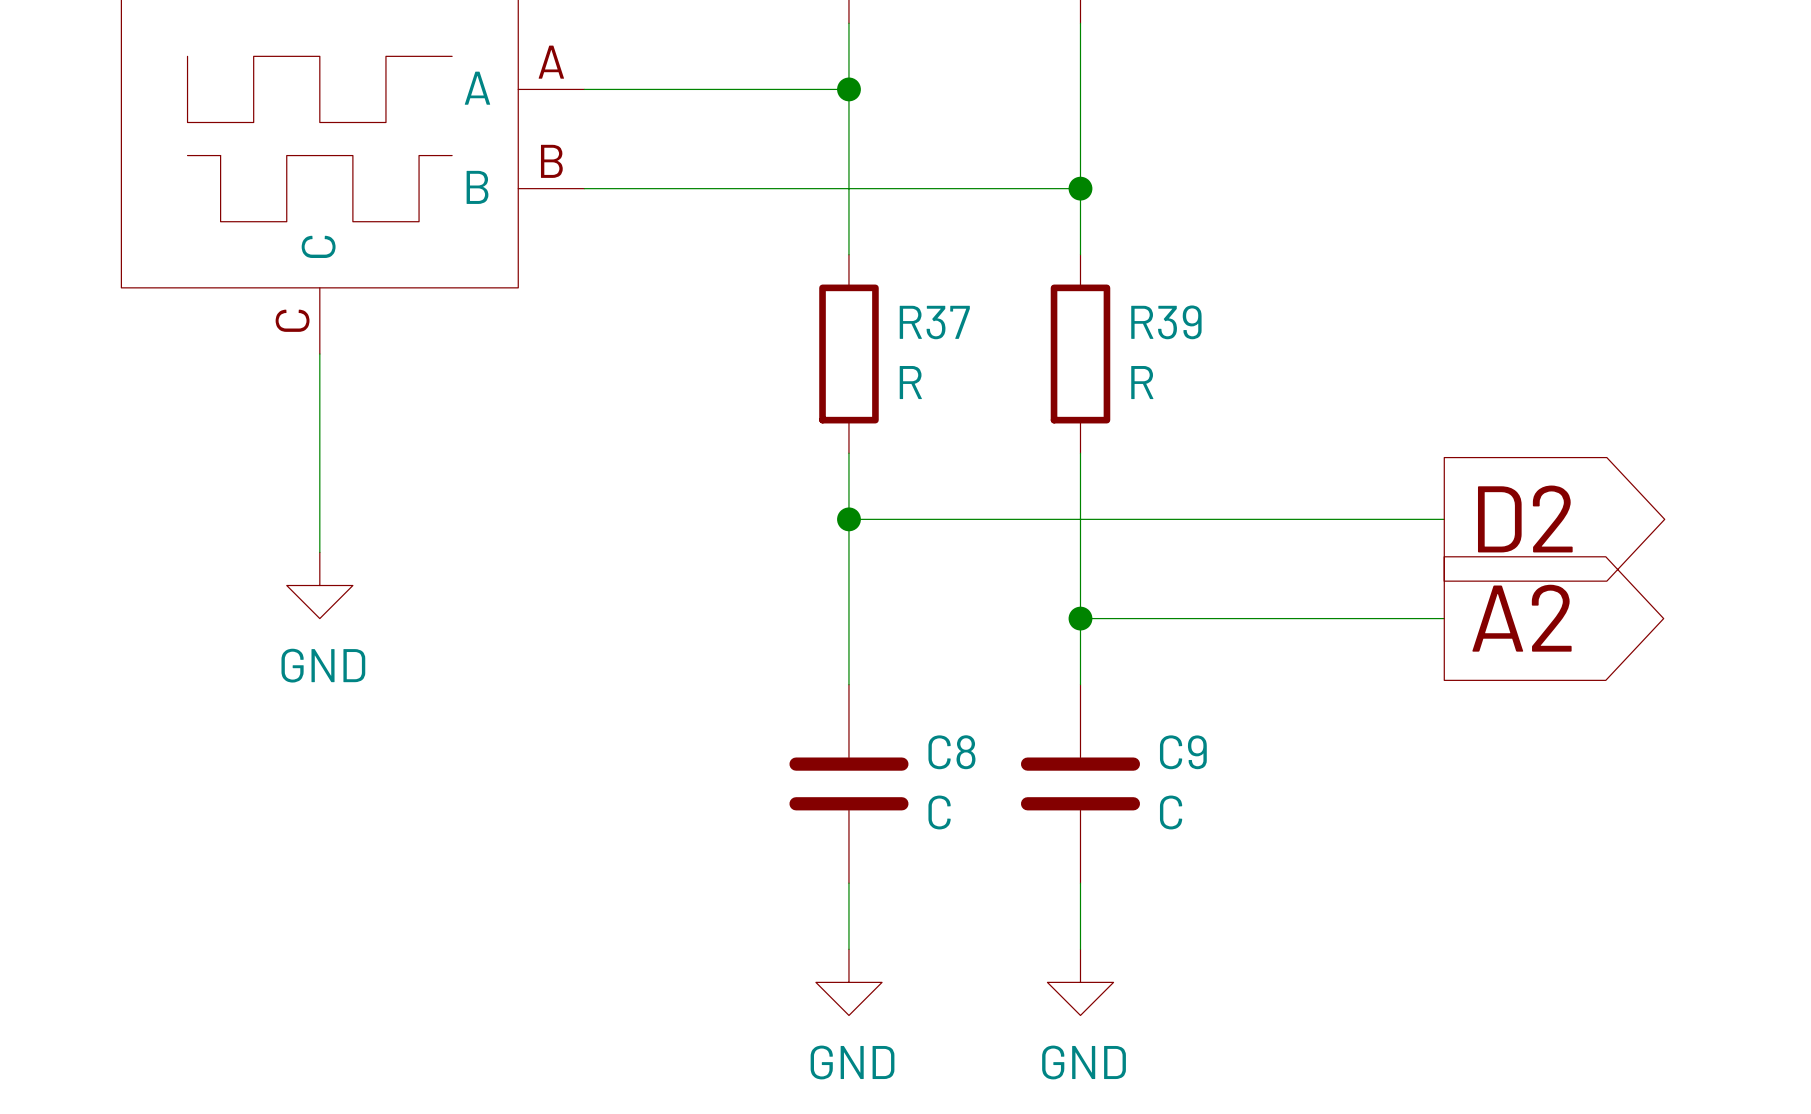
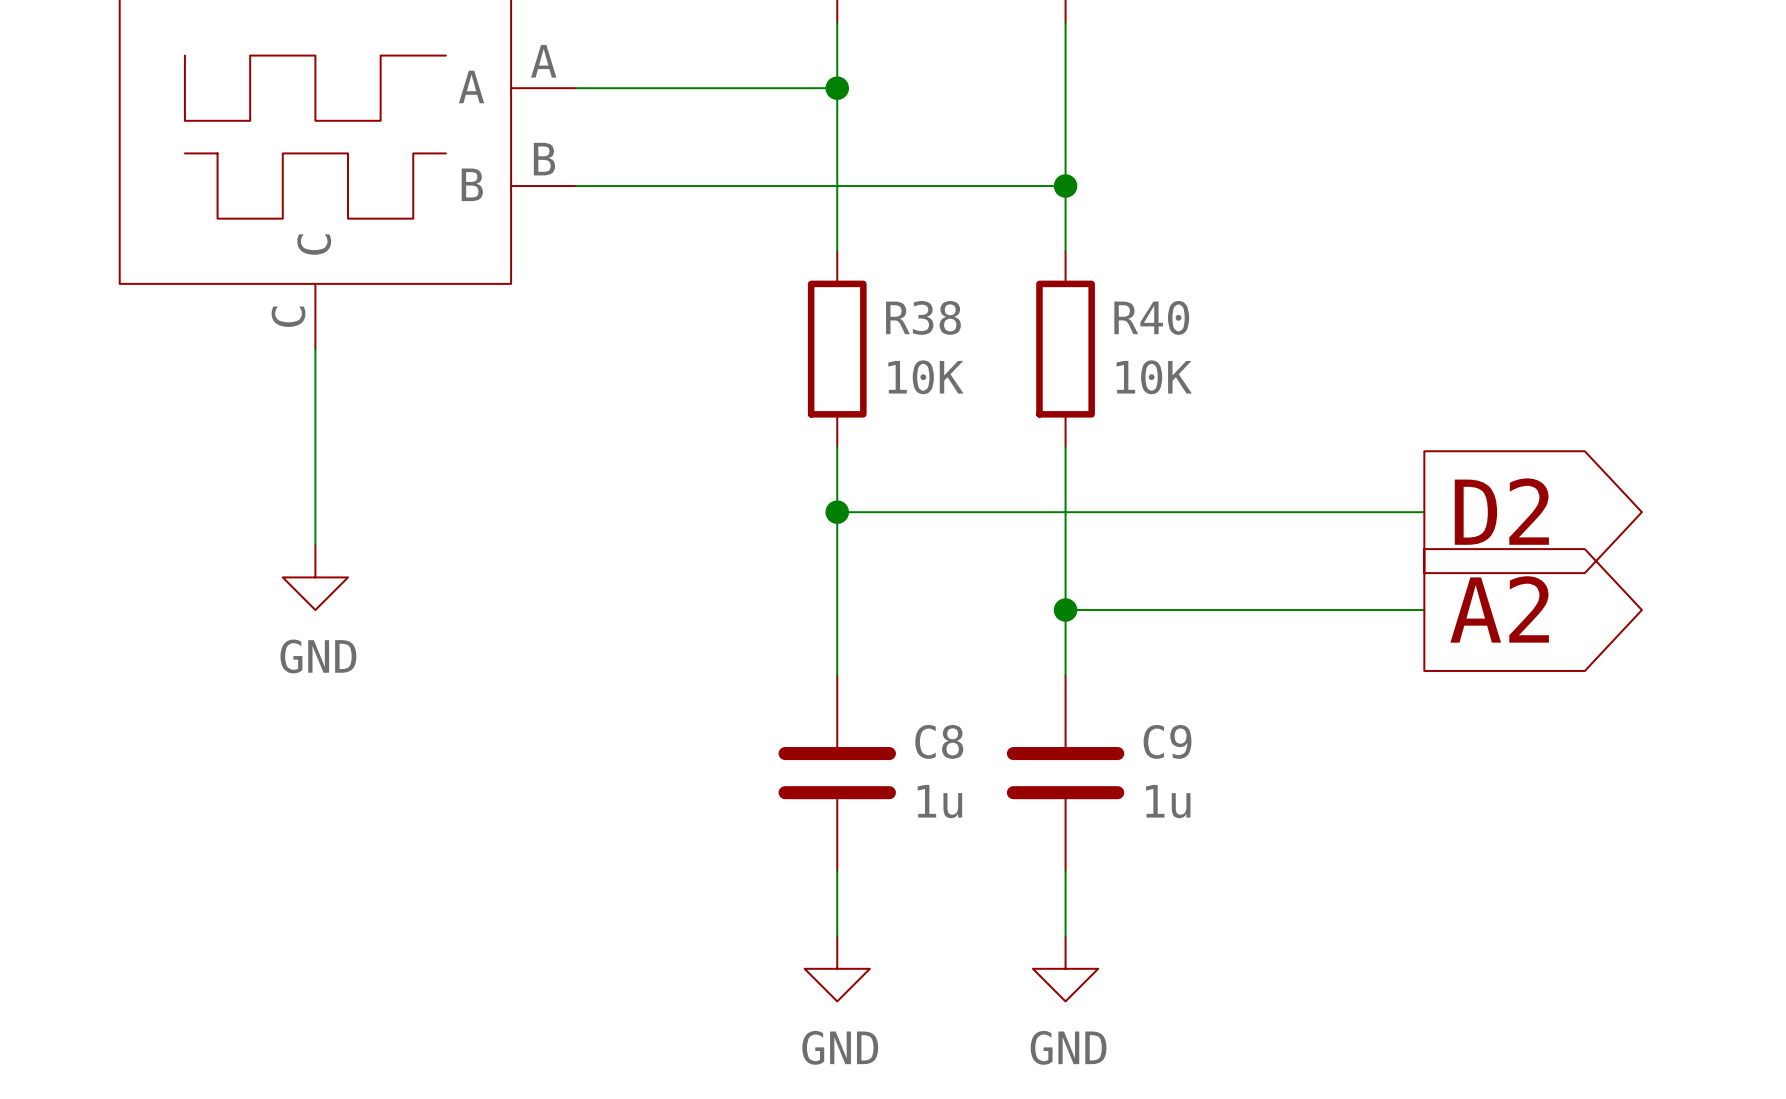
R37 name: R37 (934, 322) -> R38 (923, 317)
R39 name: R39 (1166, 322) -> R40 (1151, 317)
R37 value: R (910, 382) -> 10K (925, 377)
R39 value: R (1142, 382) -> 10K (1154, 377)
C8 value: C (939, 812) -> 1u (939, 801)
C9 value: C (1171, 812) -> 1u (1168, 801)

